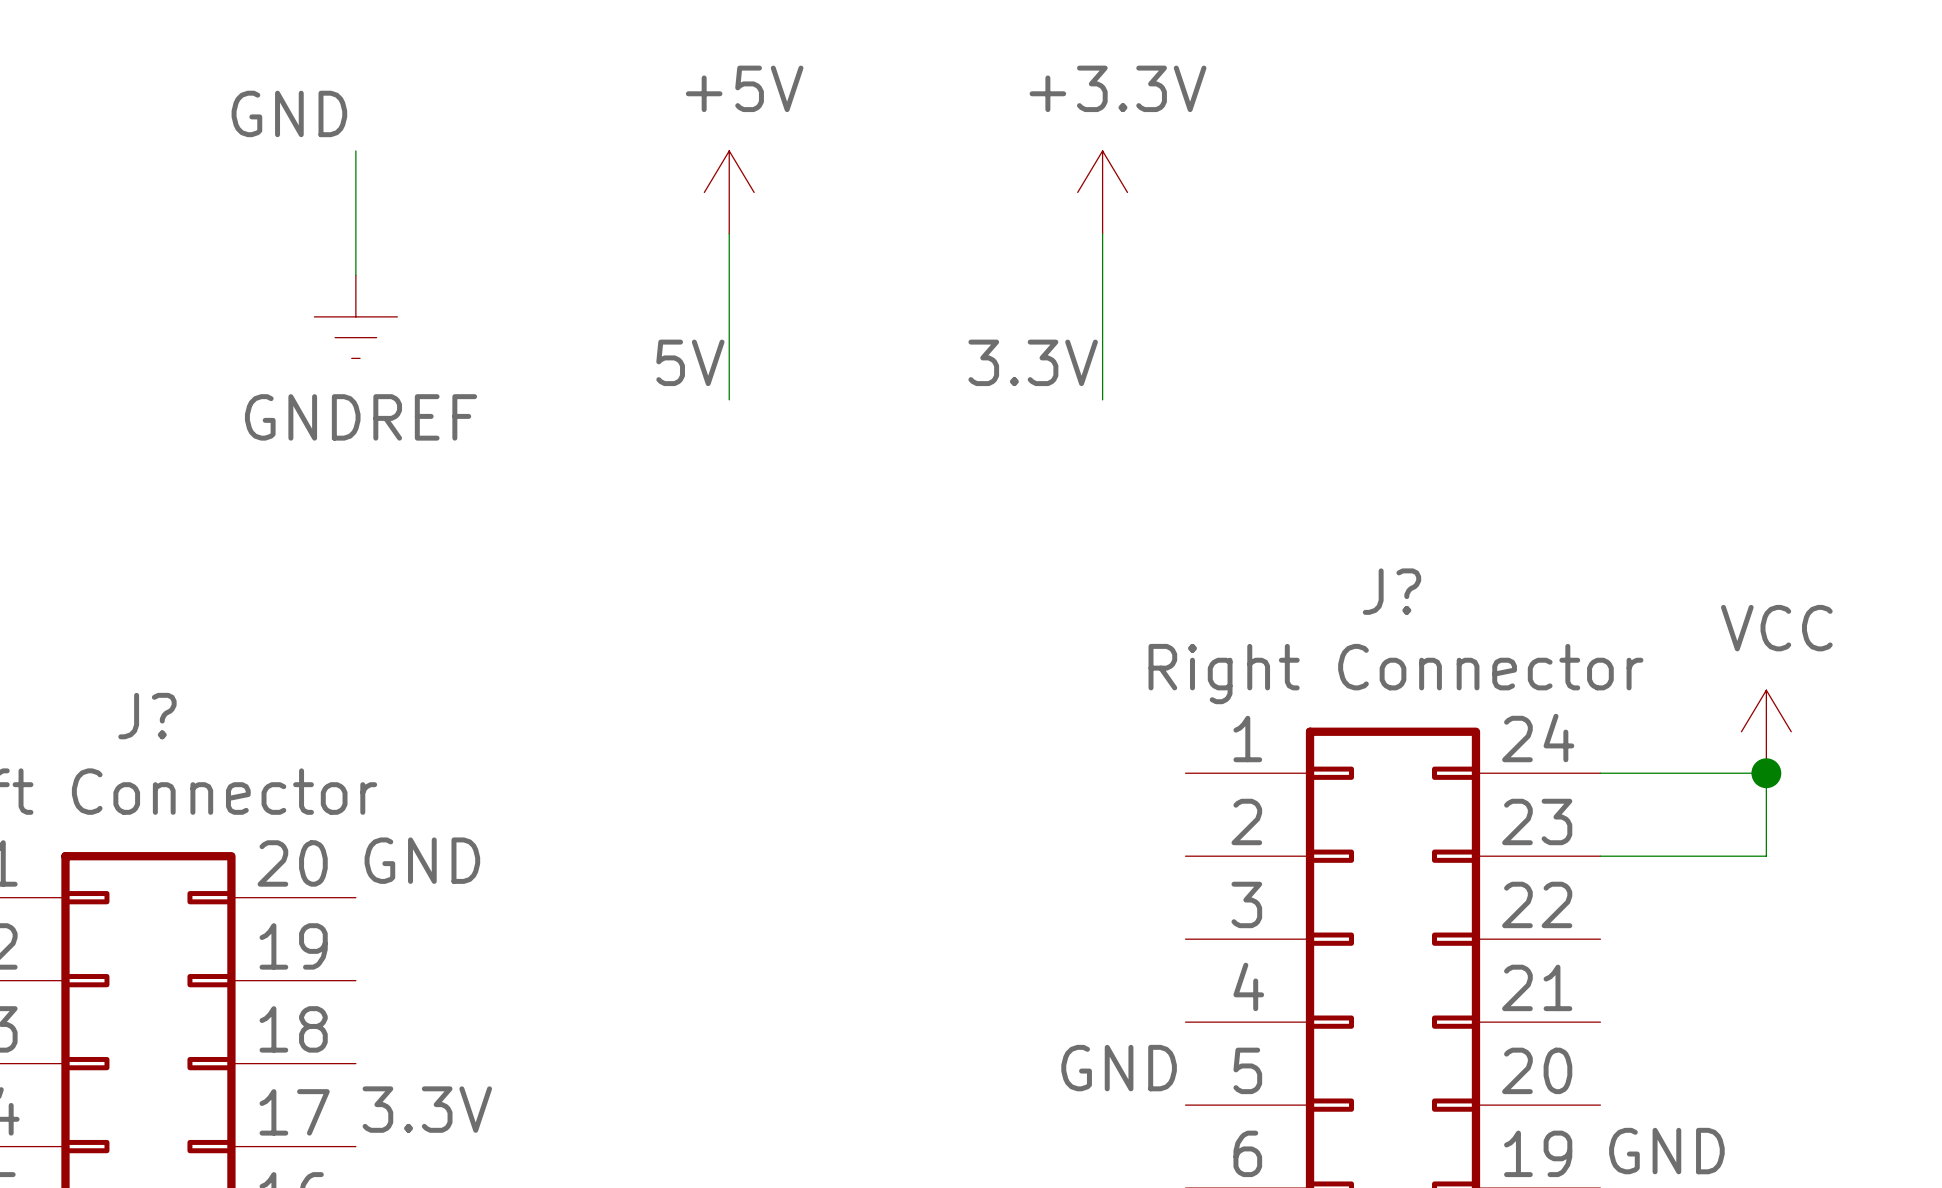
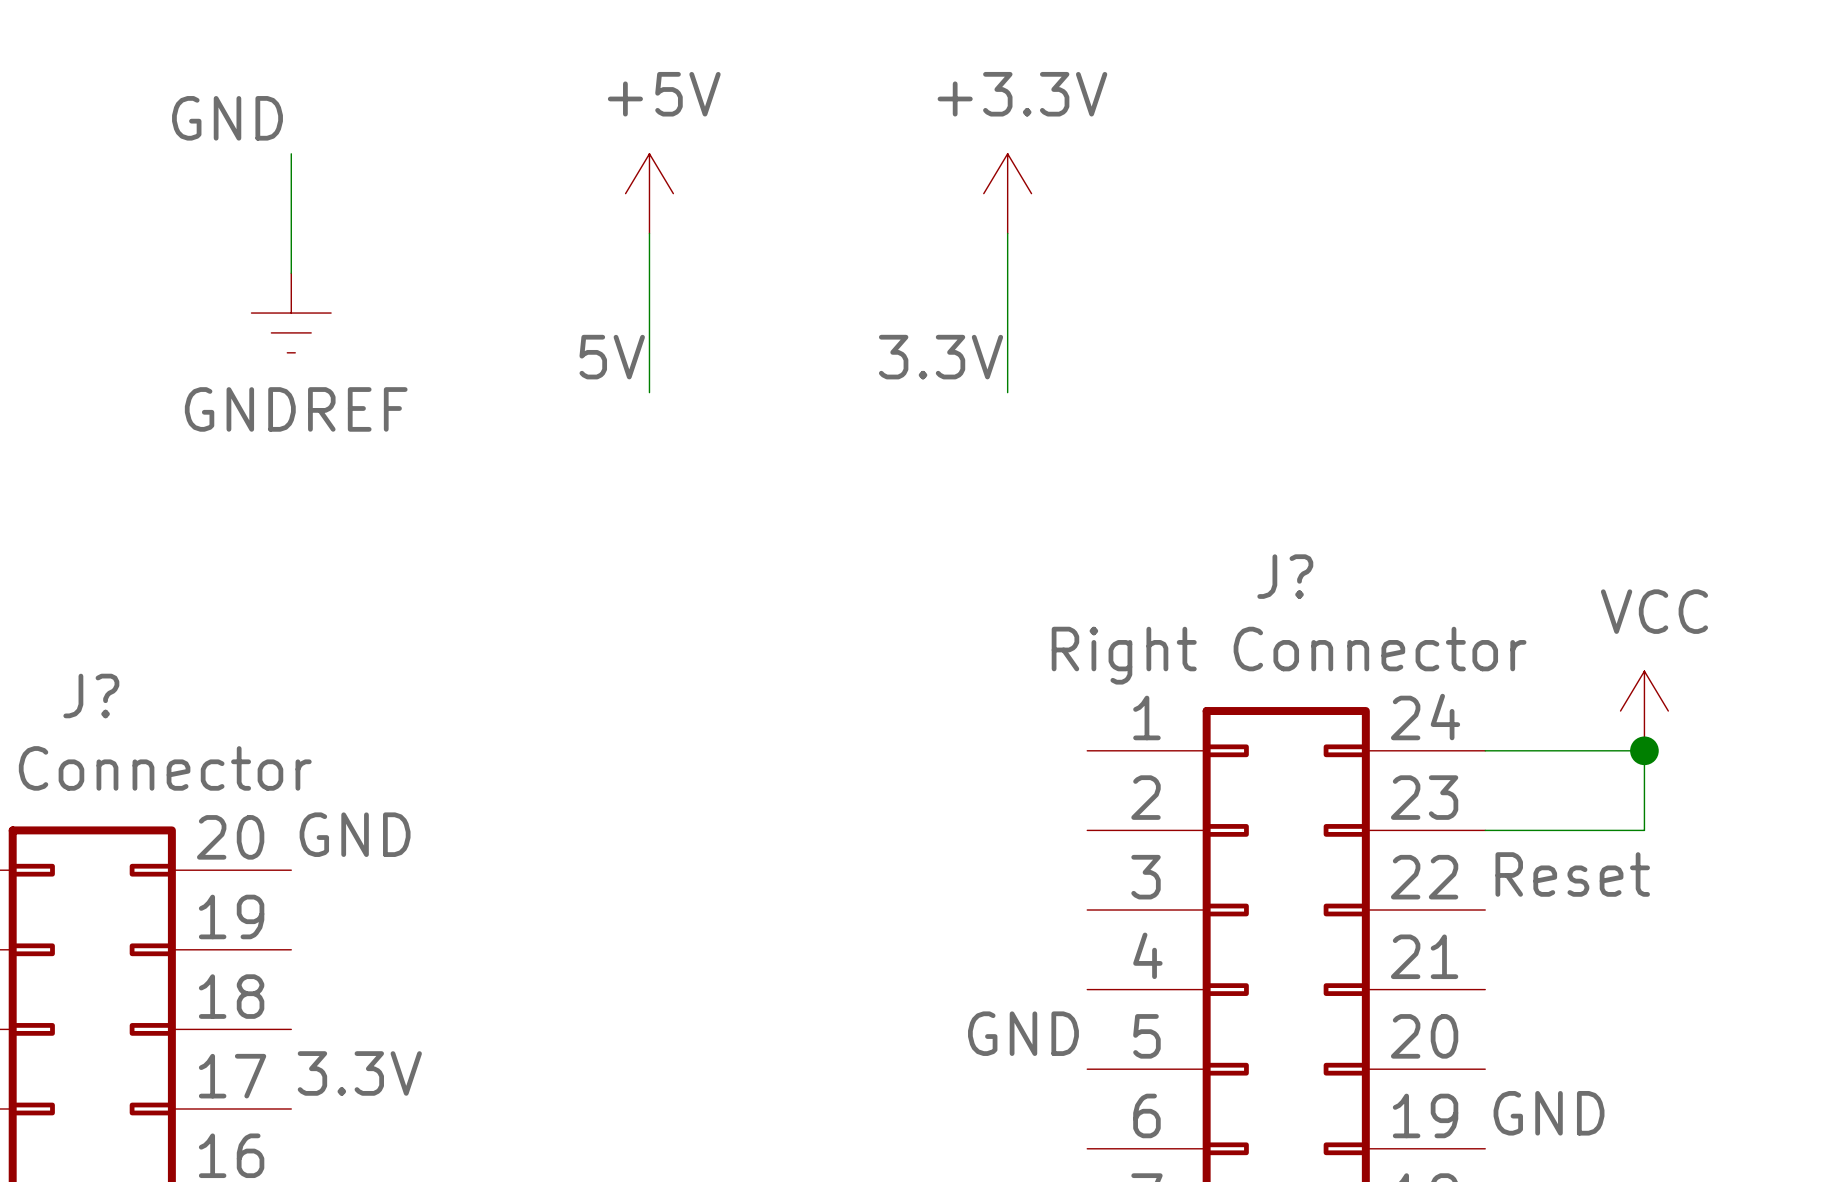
label: none -> Reset (1572, 874)

